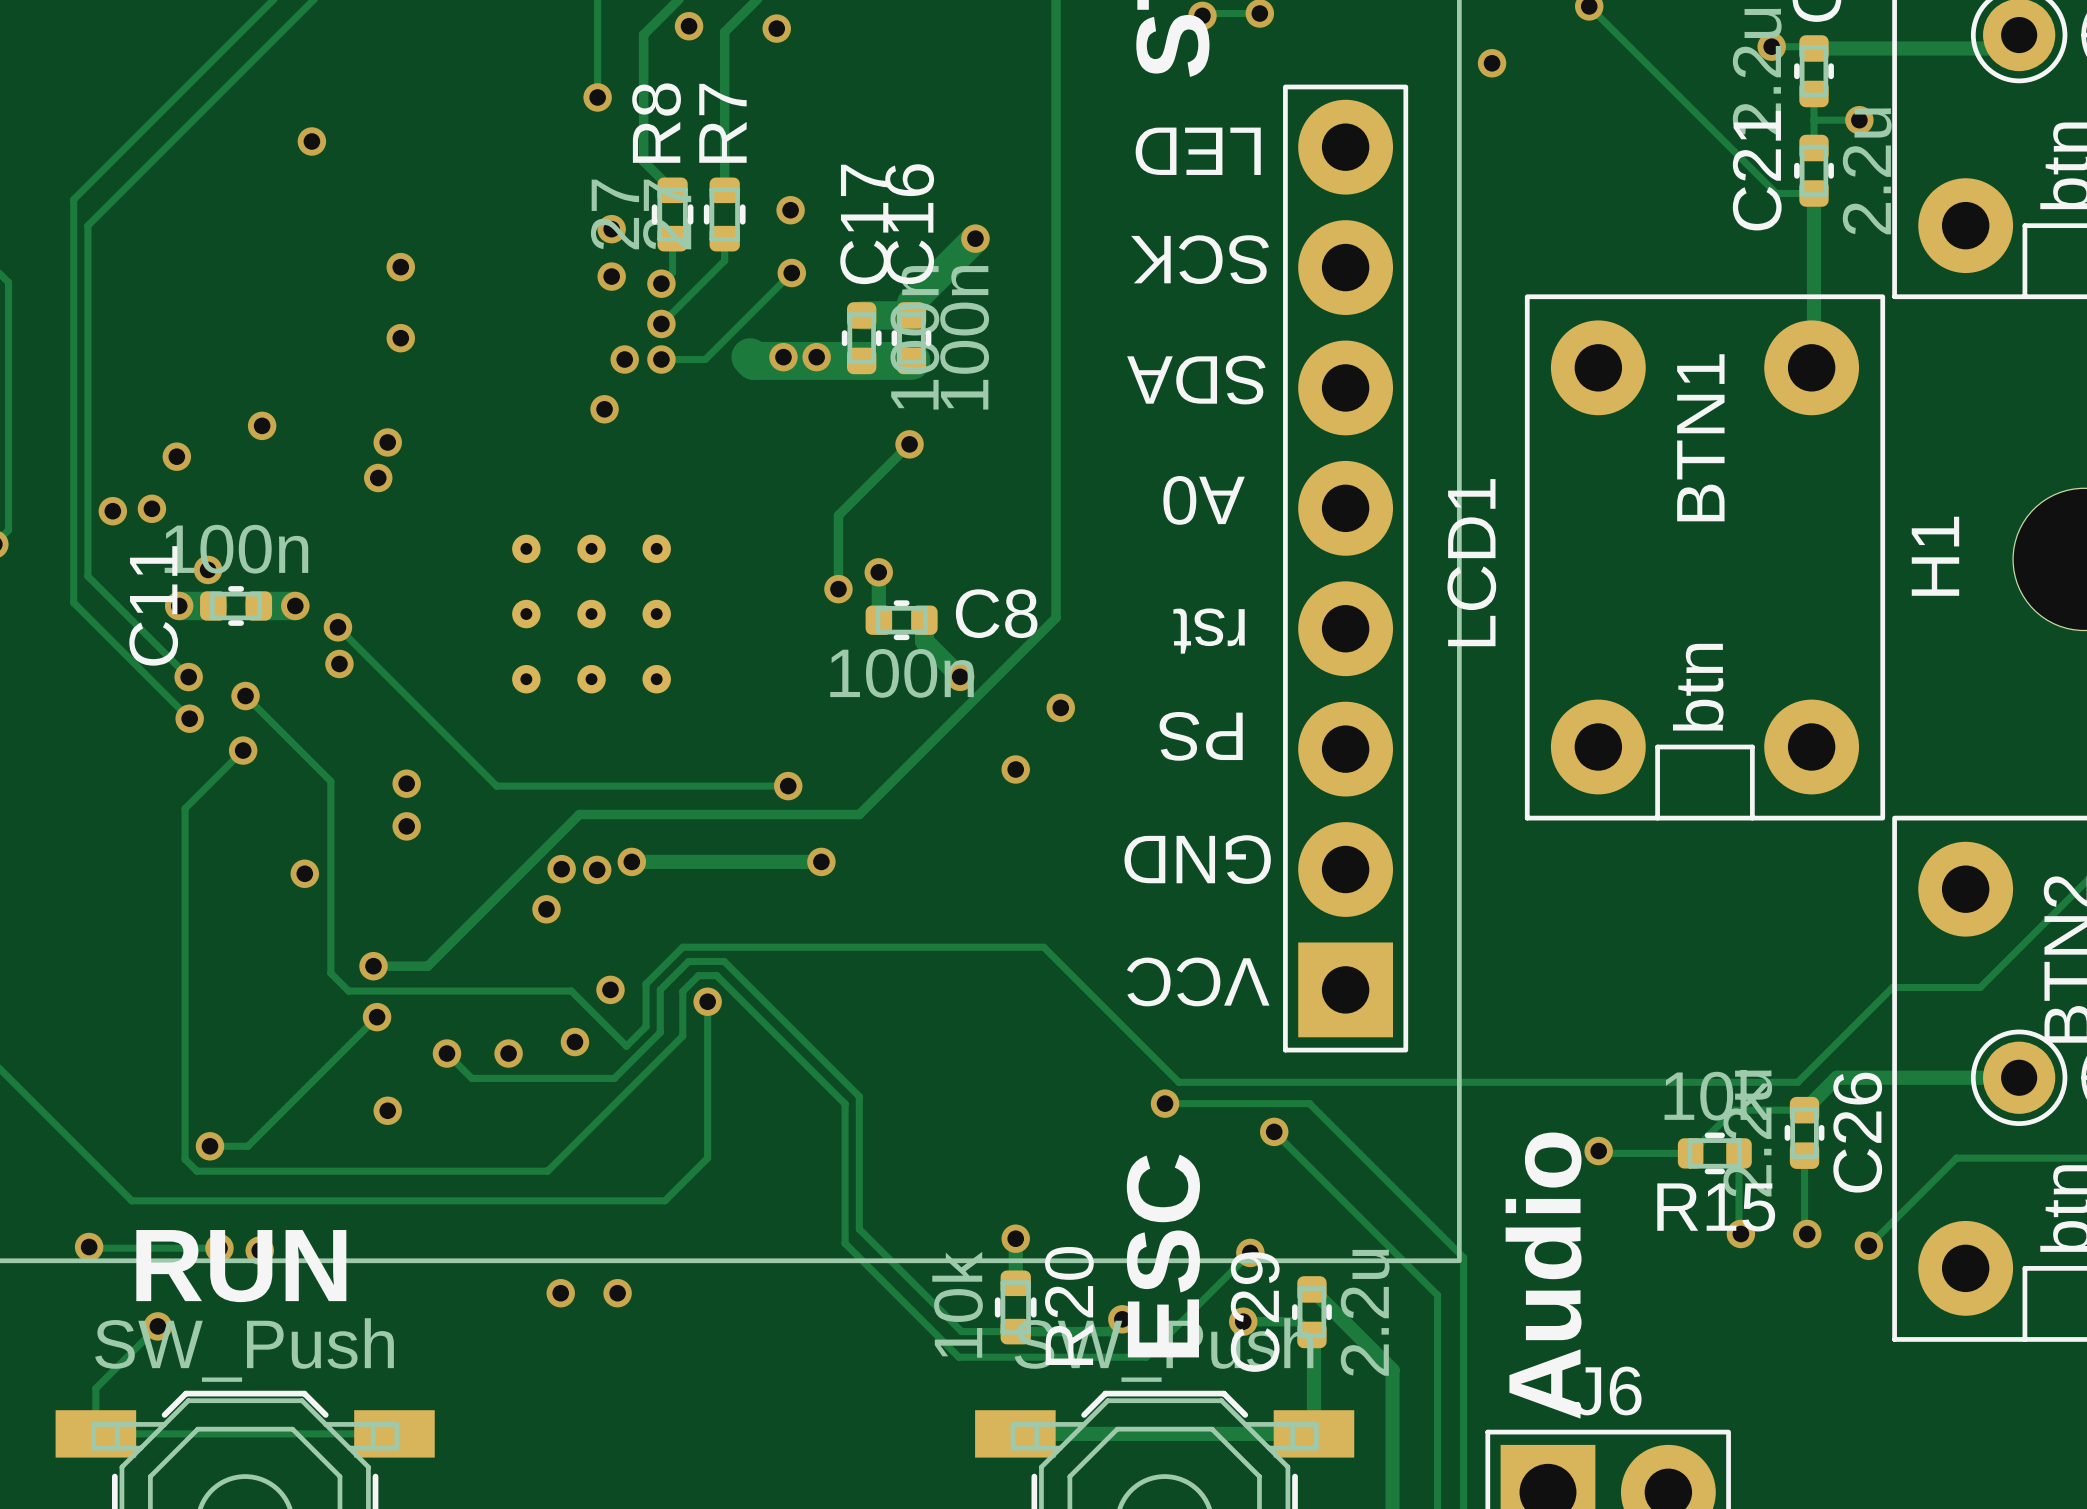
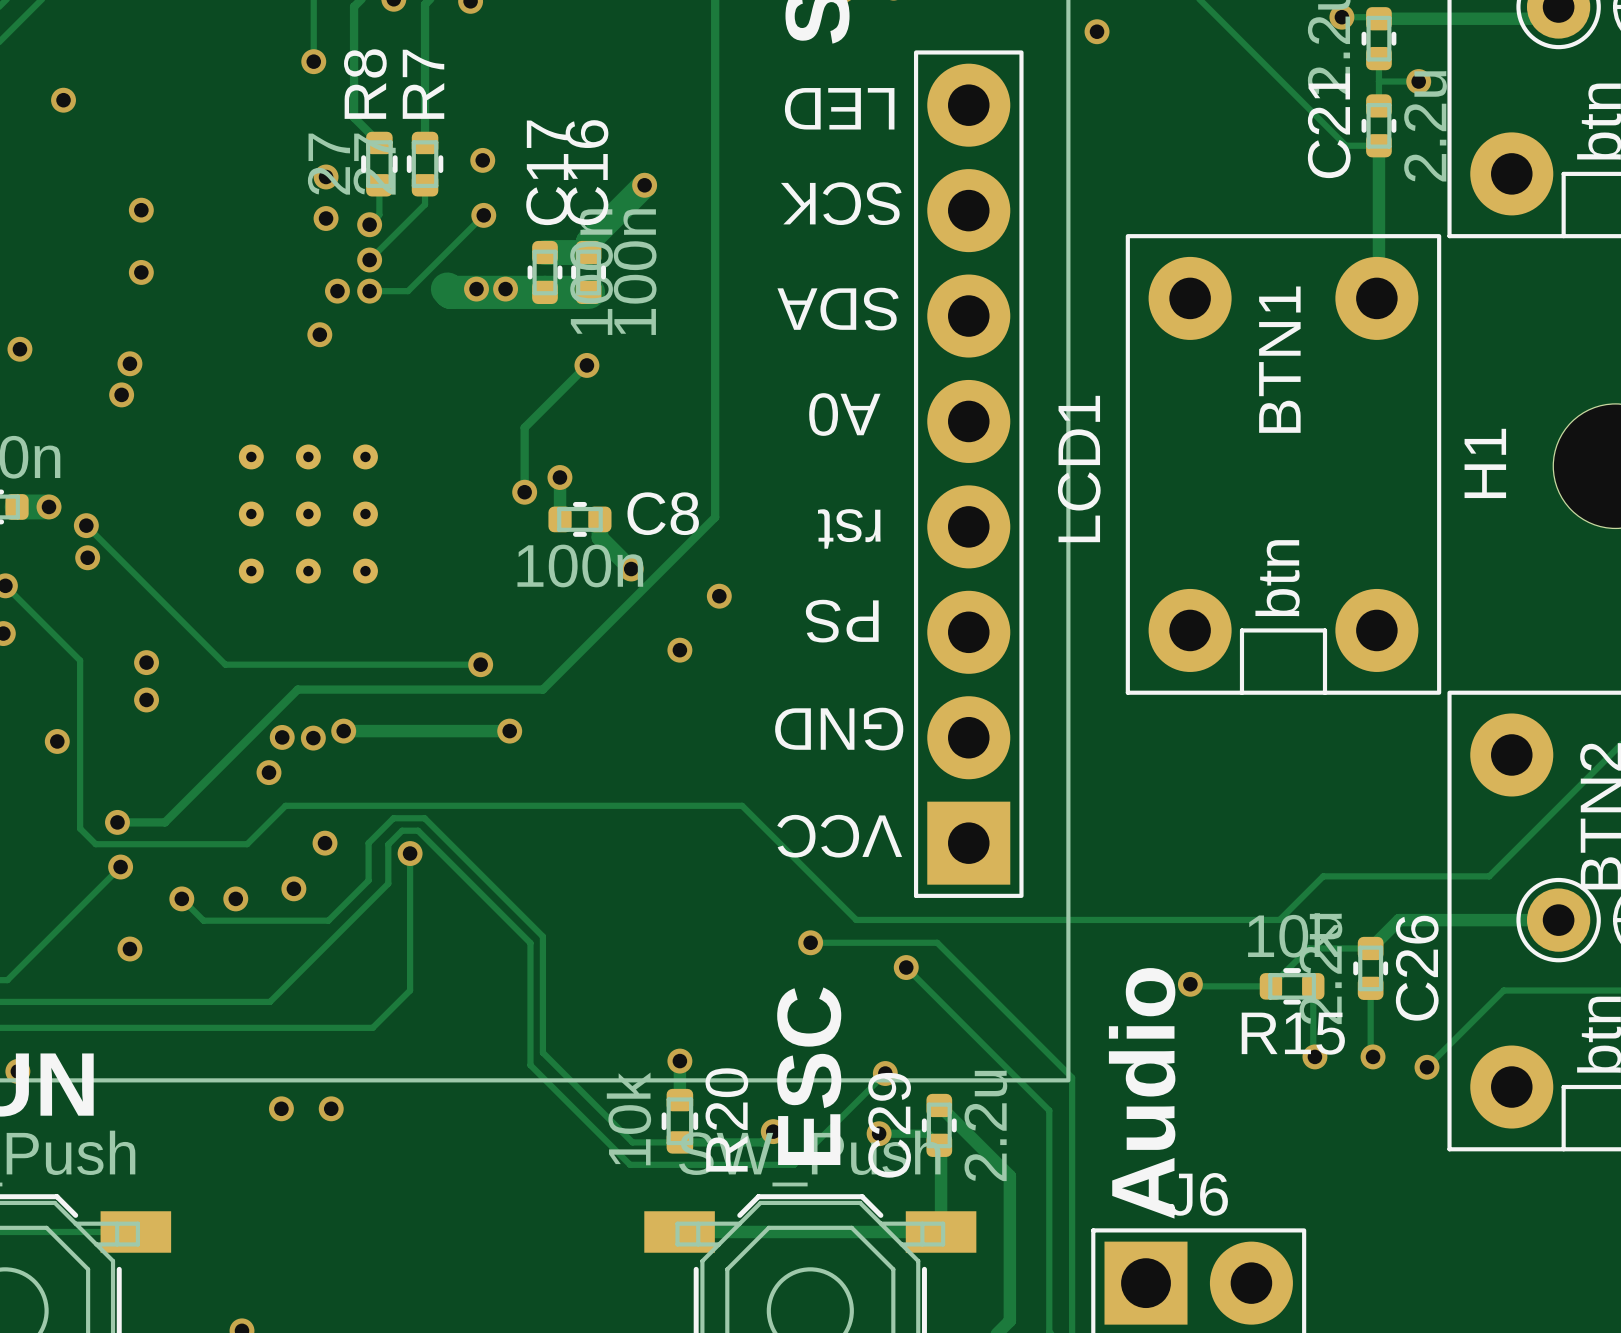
track: (682, 947) (646, 984) (646, 1026) (626, 1046) (571, 991) (521, 991) -> (388, 805) (285, 805) (247, 844)
track: (1043, 947) (1178, 1082) (1797, 1082) (1892, 987) (1980, 987) -> (704, 805) (742, 805) (856, 919) (1279, 919) (1323, 876) (1489, 876) (1524, 841)

